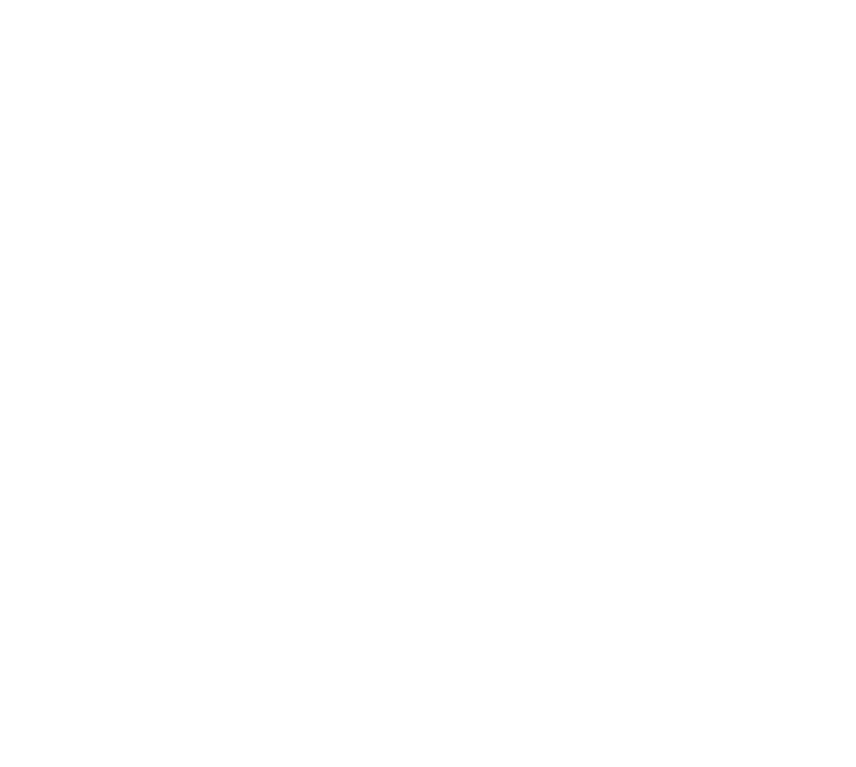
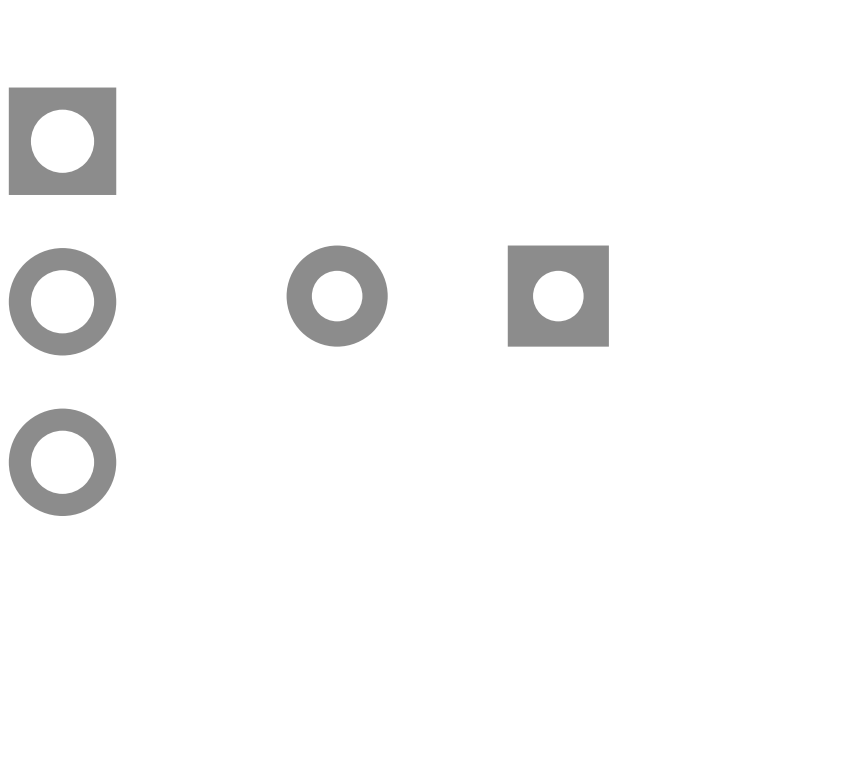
part: none -> (447, 296)
part: none -> (62, 301)

